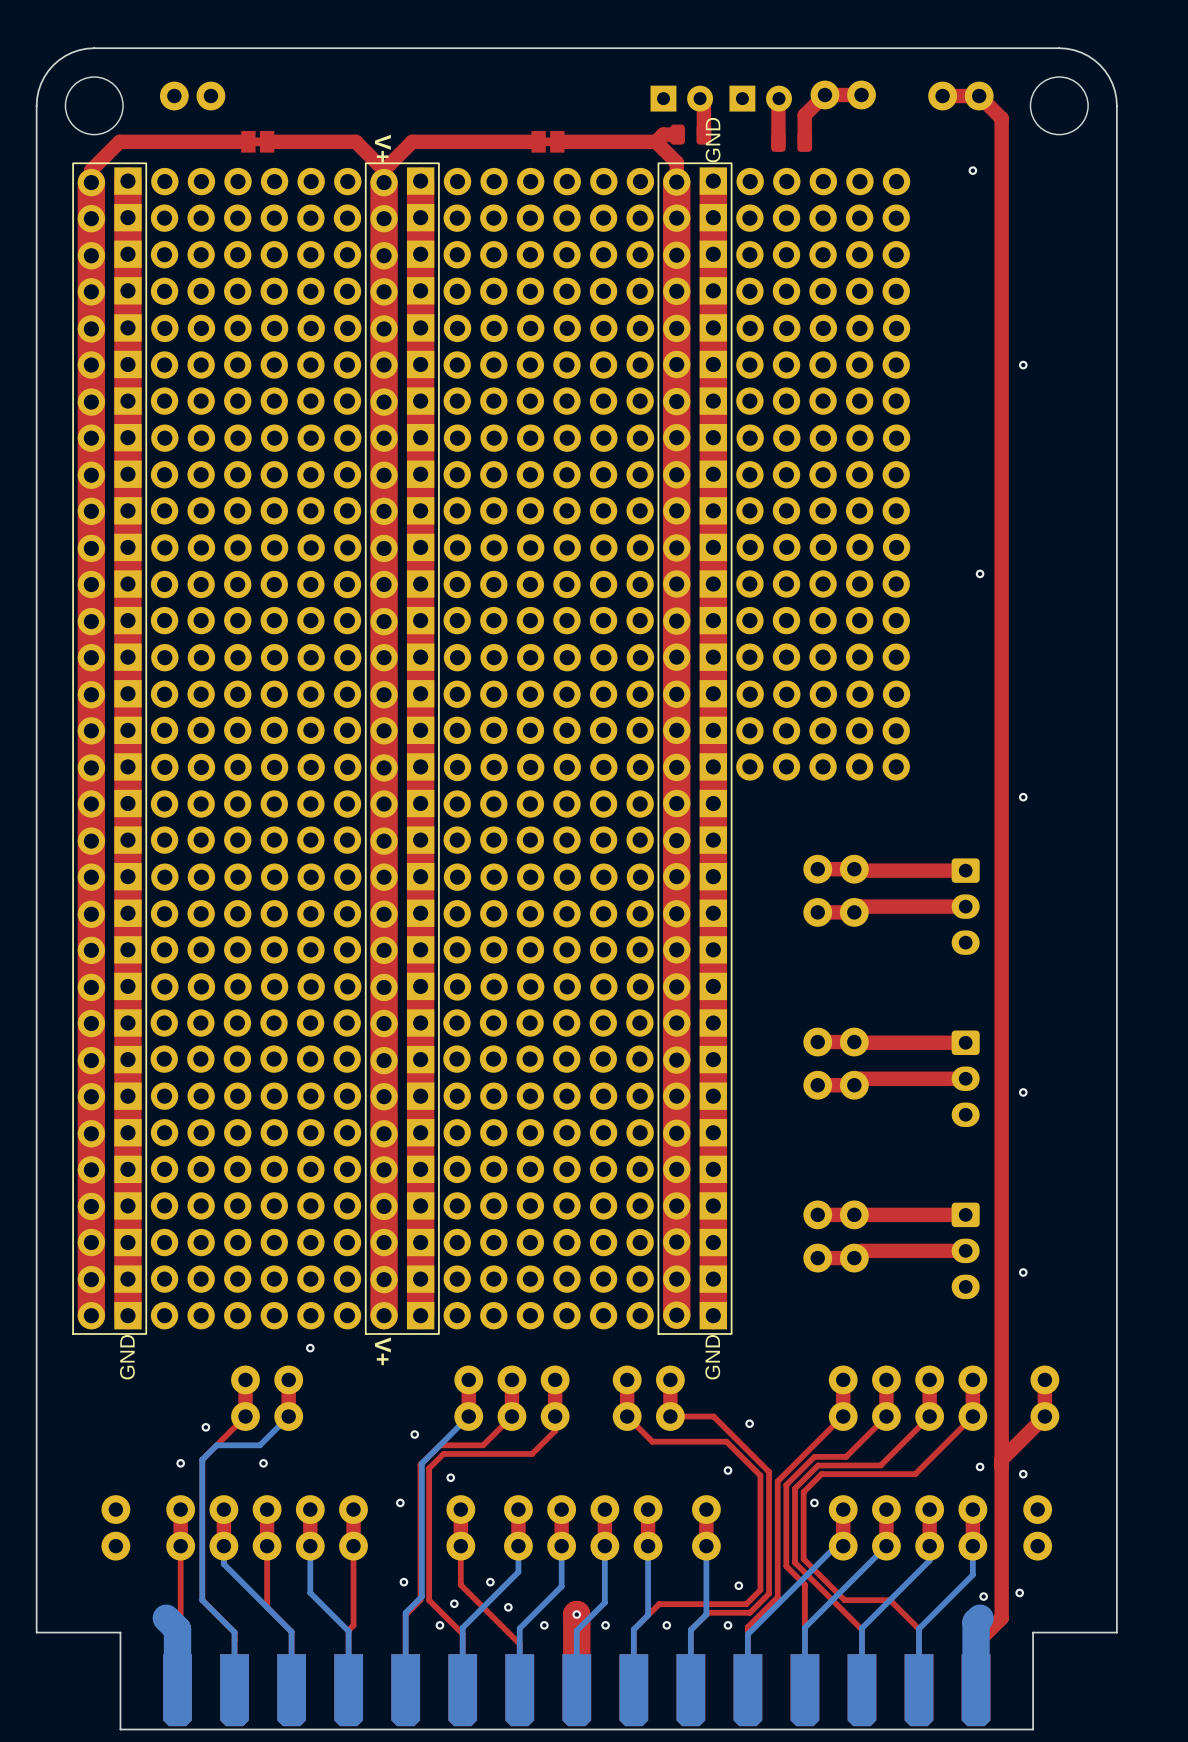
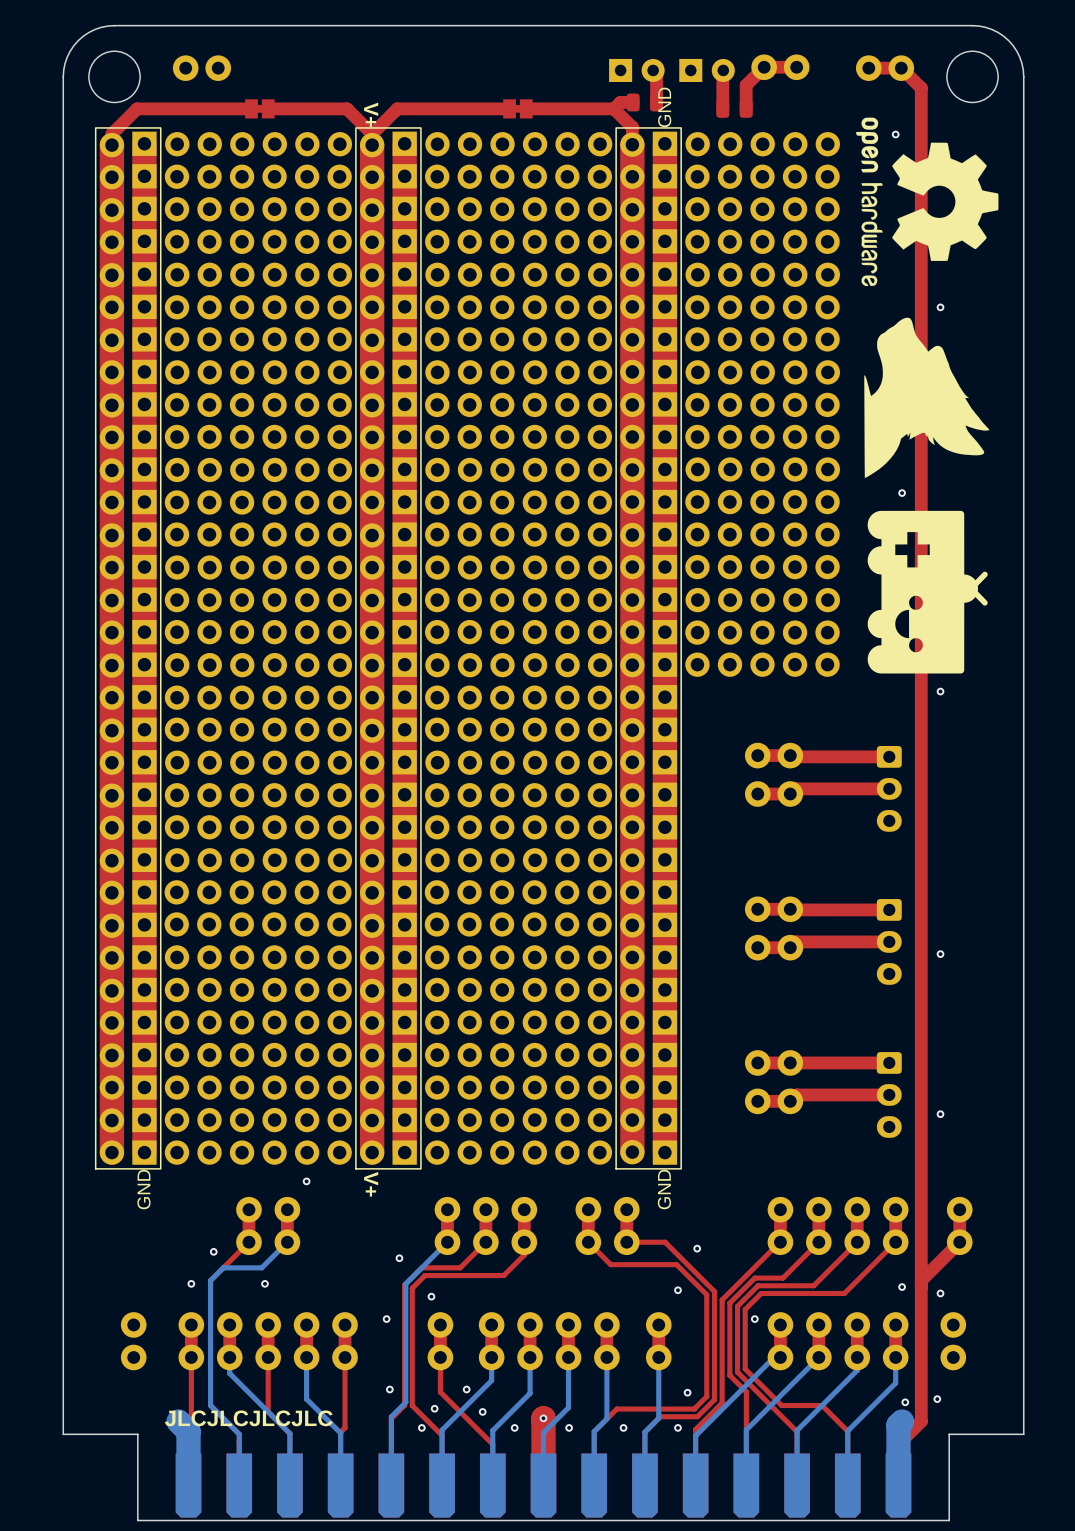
drawing: none -> [855, 117, 999, 287]
drawing: none -> [864, 317, 990, 479]
drawing: none -> [867, 510, 988, 674]
text: none -> JLCJLCJLCJLC (248, 1418)

